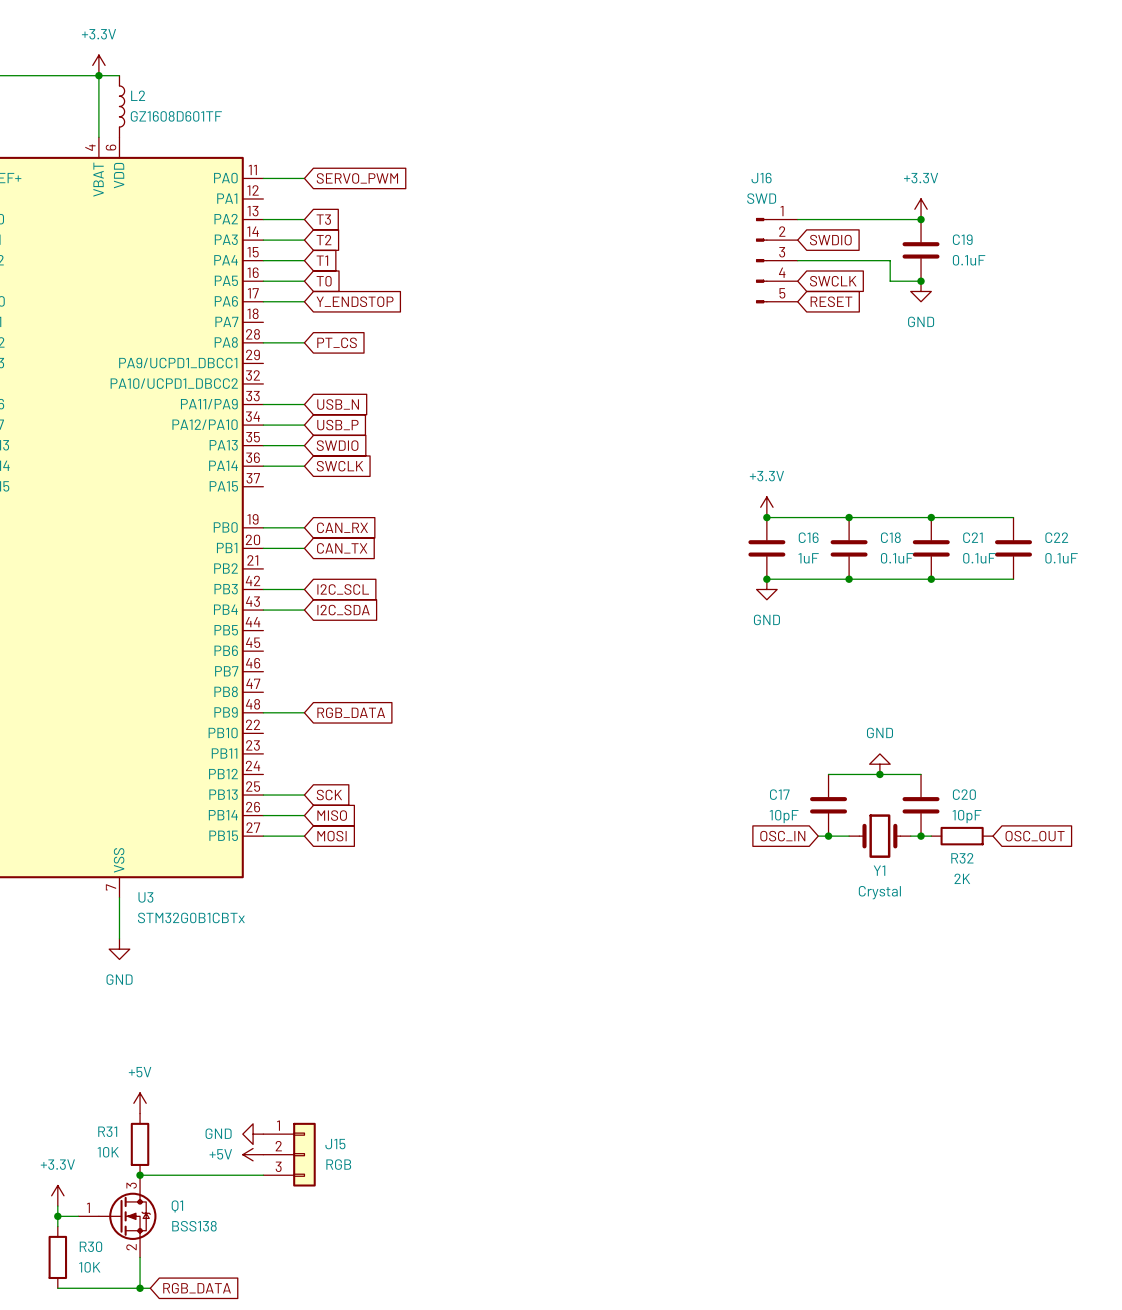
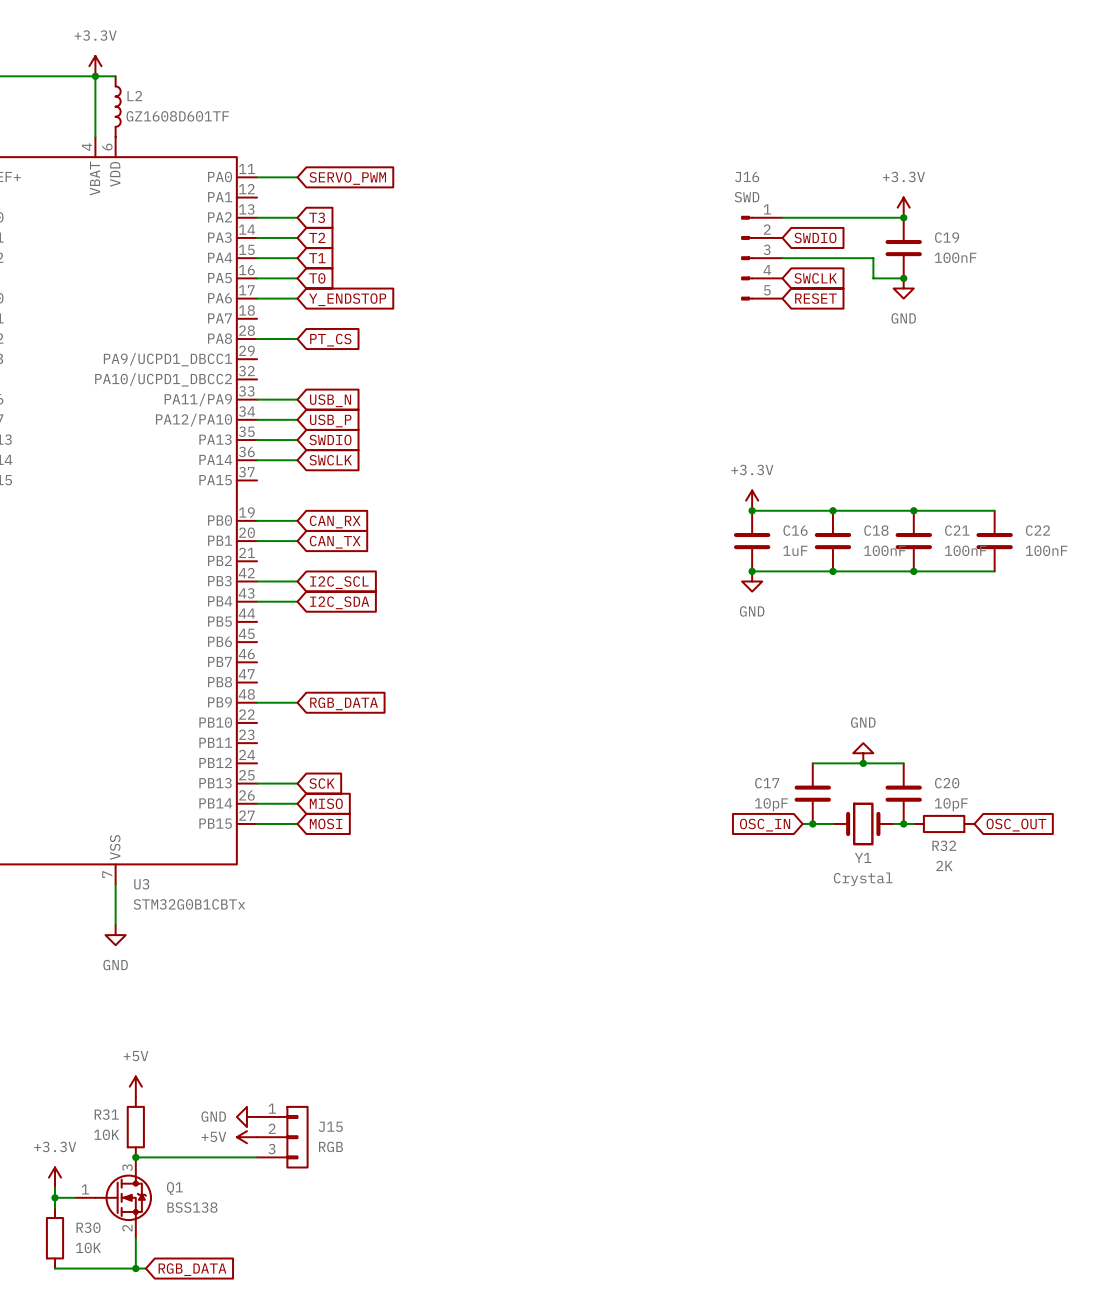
C19 value: 0.1uF (969, 260) -> 100nF (955, 257)
C18 value: 0.1uF (897, 558) -> 100nF (884, 550)
C21 value: 0.1uF (979, 558) -> 100nF (965, 550)
C22 value: 0.1uF (1061, 558) -> 100nF (1046, 550)

